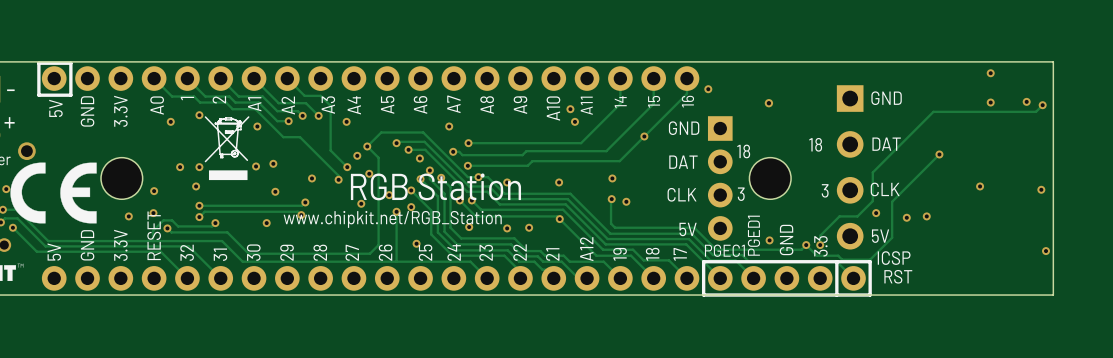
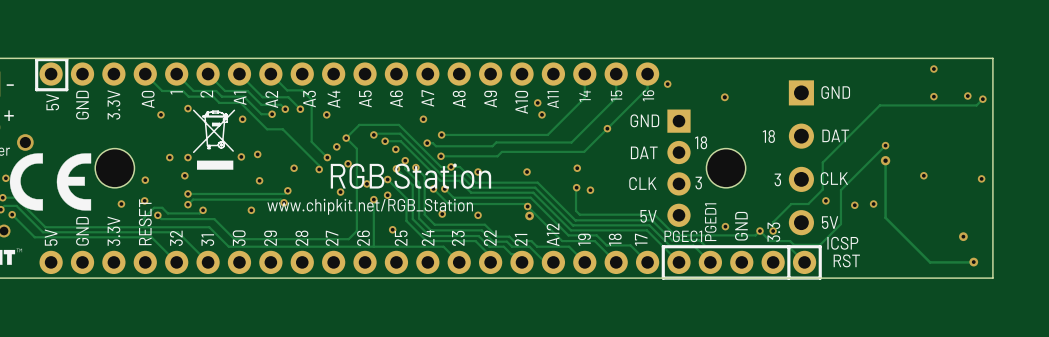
track: none -> (885, 160) (885, 217) (930, 262) (973, 262)
via: none -> (885, 160)
via: (529, 227) -> none
via: none -> (529, 215)
via: none -> (963, 236)
via: (1046, 251) -> none
via: none -> (973, 262)

